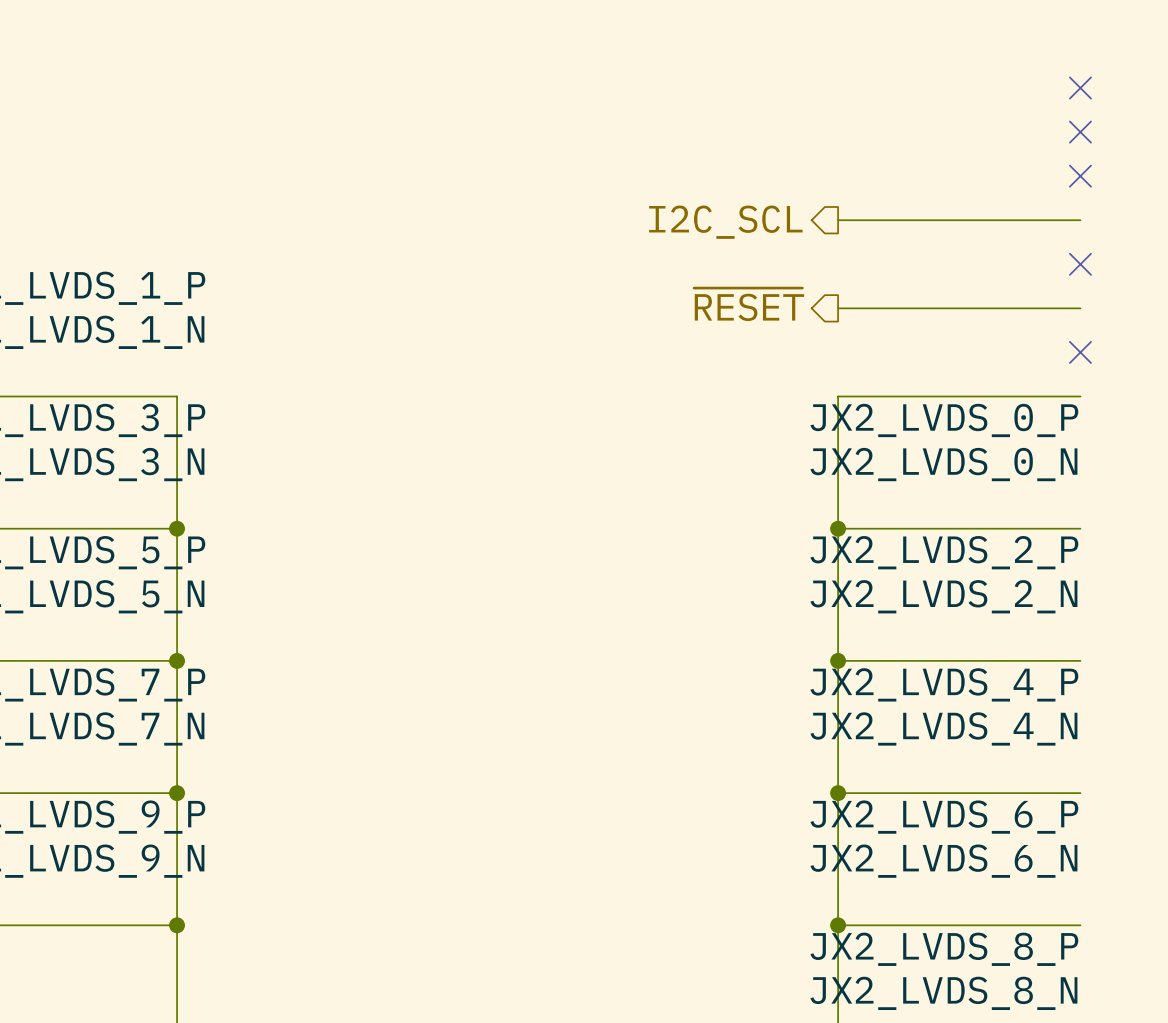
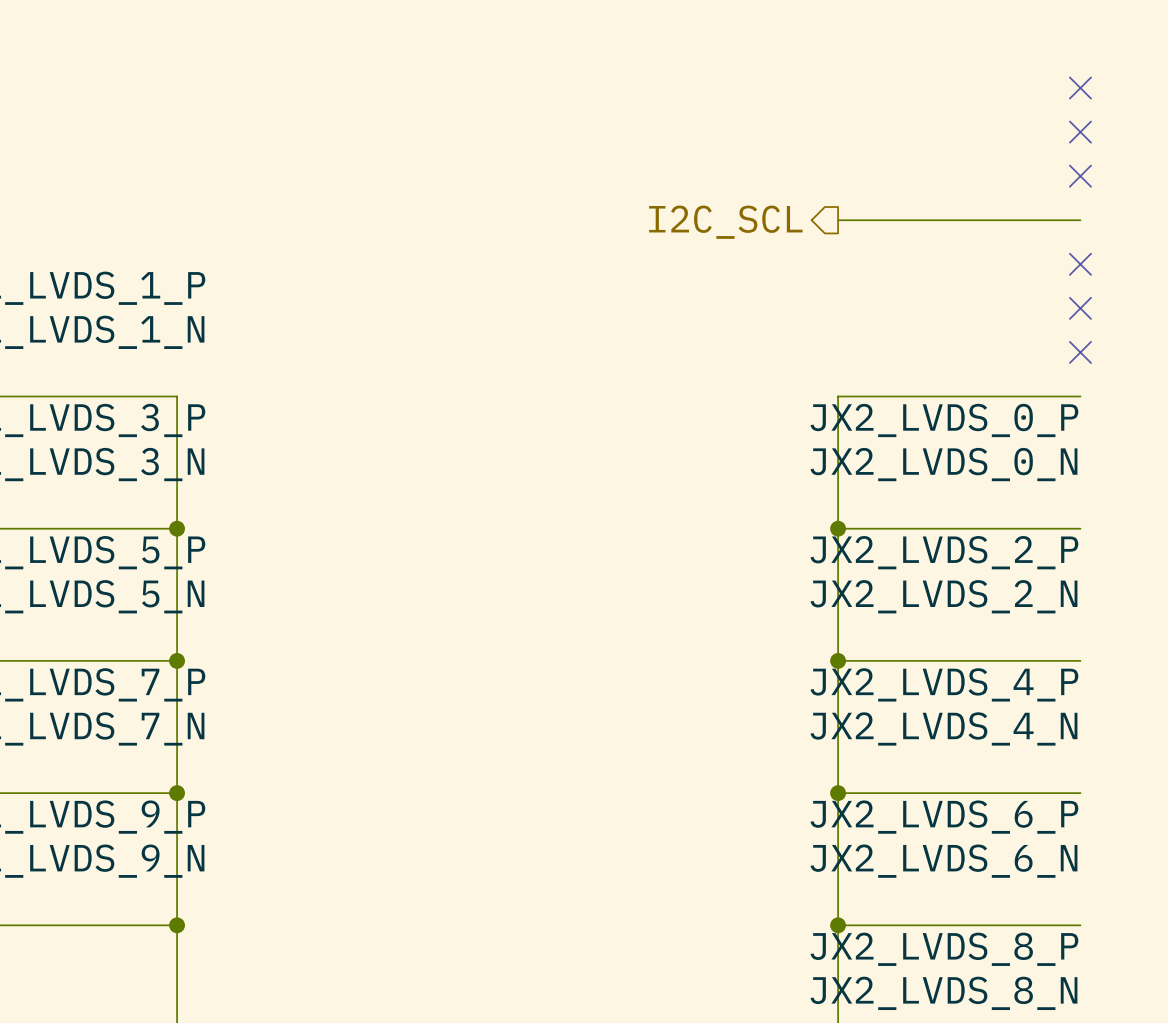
hierarchical label: ~{RESET} (749, 304) -> none
wire: (838, 308) (1080, 308) -> none
no-connect mark: none -> (1080, 308)

